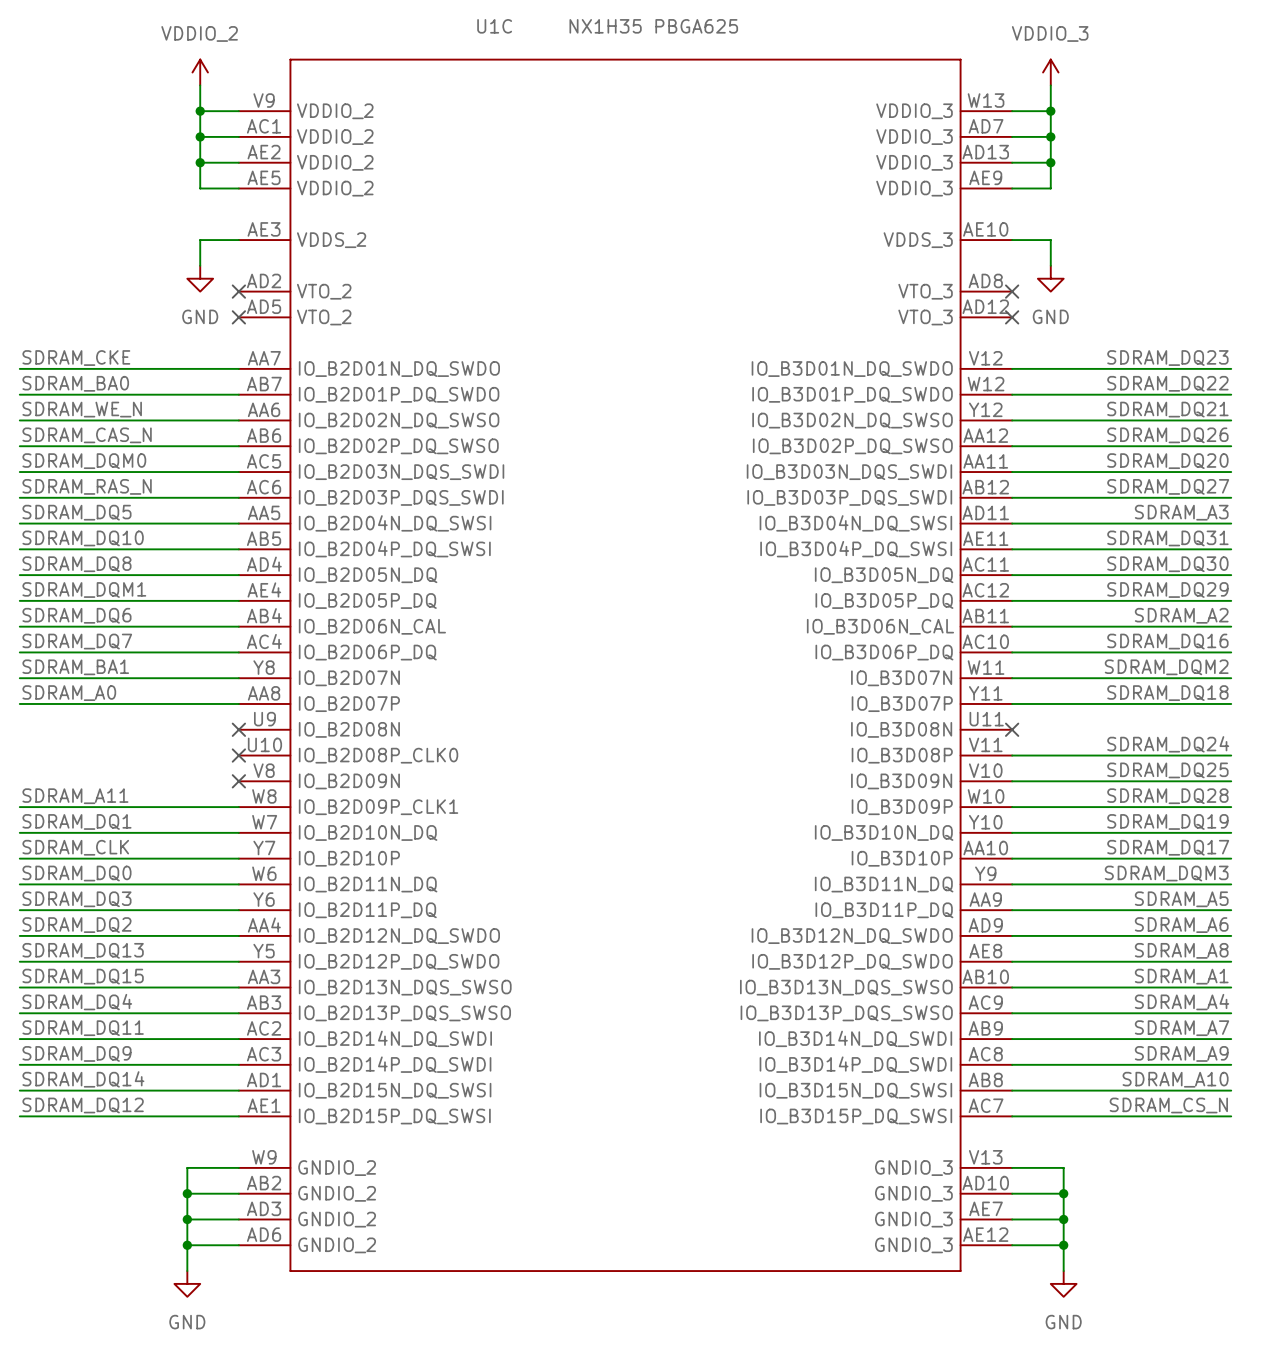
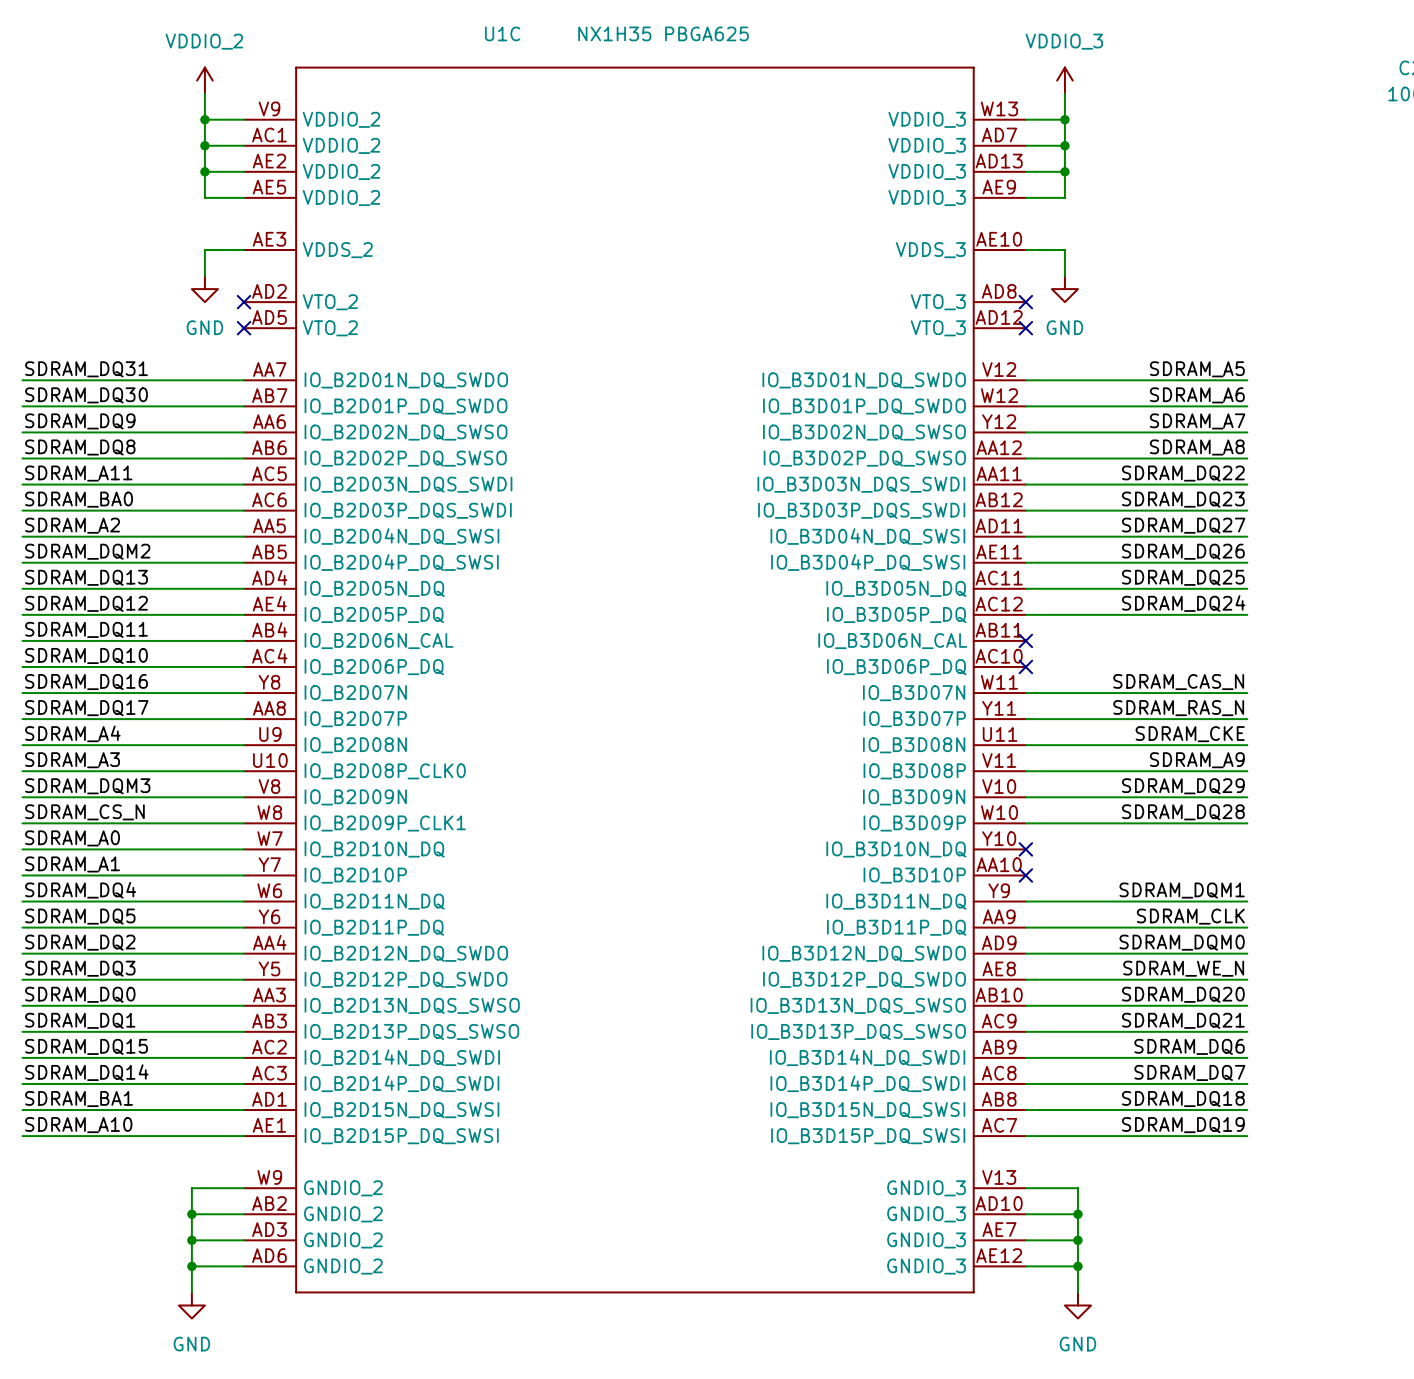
label: SDRAM_CKE (76, 358) -> SDRAM_DQ31 (86, 369)
label: SDRAM_DQ23 (1167, 358) -> SDRAM_A5 (1197, 369)
label: SDRAM_BA0 (75, 383) -> SDRAM_DQ30 (86, 395)
label: SDRAM_DQ22 (1167, 383) -> SDRAM_A6 (1197, 395)
label: SDRAM_WE_N (82, 409) -> SDRAM_DQ9 (80, 421)
label: SDRAM_DQ21 (1167, 409) -> SDRAM_A7 (1197, 421)
label: SDRAM_CAS_N (87, 435) -> SDRAM_DQ8 (80, 447)
label: SDRAM_DQ26 (1167, 435) -> SDRAM_A8 (1197, 447)
label: SDRAM_DQM0 (84, 461) -> SDRAM_A11 (78, 473)
label: SDRAM_DQ20 (1167, 461) -> SDRAM_DQ22 (1183, 473)
label: SDRAM_RAS_N (87, 486) -> SDRAM_BA0 (79, 499)
label: SDRAM_DQ27 (1168, 486) -> SDRAM_DQ23 (1183, 499)
label: SDRAM_DQ5 (76, 512) -> SDRAM_A2 (72, 525)
label: SDRAM_A3 (1181, 512) -> SDRAM_DQ27 (1183, 525)
label: SDRAM_DQ10 (83, 538) -> SDRAM_DQM2 (87, 551)
label: SDRAM_DQ31 (1167, 538) -> SDRAM_DQ26 (1183, 551)
label: SDRAM_DQ8 (76, 564) -> SDRAM_DQ13 (86, 577)
label: SDRAM_DQ30 (1167, 564) -> SDRAM_DQ25 (1183, 577)
label: SDRAM_DQM1 (84, 590) -> SDRAM_DQ12 (86, 603)
label: SDRAM_DQ29 (1167, 590) -> SDRAM_DQ24 (1183, 603)
label: SDRAM_DQ6 (76, 615) -> SDRAM_DQ11 (86, 629)
label: SDRAM_A2 (1181, 615) -> none
wire: (1012, 626) (1231, 626) -> none
no-connect mark: none -> (1025, 640)
label: SDRAM_DQ7 (77, 641) -> SDRAM_DQ10 (86, 655)
label: SDRAM_DQ16 (1167, 641) -> none
wire: (1012, 652) (1231, 652) -> (1025, 745) (1247, 745)
no-connect mark: none -> (1025, 666)
label: SDRAM_BA1 (75, 667) -> SDRAM_DQ16 (86, 682)
label: SDRAM_DQM2 (1166, 667) -> SDRAM_CAS_N (1178, 682)
label: SDRAM_A0 (69, 693) -> SDRAM_DQ17 (86, 708)
label: SDRAM_DQ18 (1167, 693) -> SDRAM_RAS_N (1178, 708)
label: none -> SDRAM_A4 (72, 733)
label: none -> SDRAM_CKE (1190, 734)
wire: none -> (22, 745) (244, 745)
no-connect mark: (238, 729) -> none
no-connect mark: (1012, 729) -> none
label: none -> SDRAM_A3 (72, 760)
label: SDRAM_DQ24 (1168, 744) -> SDRAM_A9 (1197, 760)
wire: none -> (22, 771) (244, 771)
no-connect mark: (238, 755) -> none
label: none -> SDRAM_DQM3 (87, 786)
label: SDRAM_DQ25 (1167, 770) -> SDRAM_DQ29 (1183, 786)
wire: none -> (22, 797) (244, 797)
no-connect mark: (238, 781) -> none
label: SDRAM_A11 (75, 796) -> SDRAM_CS_N (84, 812)
label: SDRAM_DQ1 (76, 821) -> SDRAM_A0 (72, 838)
label: SDRAM_DQ19 (1167, 821) -> none
wire: (1012, 832) (1231, 832) -> none
no-connect mark: none -> (1025, 849)
label: SDRAM_CLK (75, 847) -> SDRAM_A1 (72, 864)
label: SDRAM_DQ17 (1168, 847) -> none
wire: (1012, 858) (1231, 858) -> none
no-connect mark: none -> (1025, 875)
label: SDRAM_DQ0 (76, 873) -> SDRAM_DQ4 (80, 890)
label: SDRAM_DQM3 (1166, 873) -> SDRAM_DQM1 (1182, 890)
label: SDRAM_DQ3 (76, 899) -> SDRAM_DQ5 (80, 916)
label: SDRAM_A5 (1181, 899) -> SDRAM_CLK (1190, 916)
label: SDRAM_A6 (1181, 925) -> SDRAM_DQM0 (1182, 942)
label: SDRAM_DQ13 (83, 950) -> SDRAM_DQ3 (80, 968)
label: SDRAM_A8 (1181, 950) -> SDRAM_WE_N (1183, 968)
label: SDRAM_DQ15 (83, 976) -> SDRAM_DQ0 (80, 994)
label: SDRAM_A1 (1181, 976) -> SDRAM_DQ20 (1183, 994)
label: SDRAM_DQ4 (77, 1002) -> SDRAM_DQ1 (80, 1020)
label: SDRAM_A4 (1182, 1002) -> SDRAM_DQ21 (1183, 1020)
label: SDRAM_DQ11 (83, 1028) -> SDRAM_DQ15 (86, 1046)
label: SDRAM_A7 (1182, 1028) -> SDRAM_DQ6 (1189, 1046)
label: SDRAM_DQ9 (76, 1053) -> SDRAM_DQ14 (86, 1072)
label: SDRAM_A9 (1181, 1053) -> SDRAM_DQ7 (1189, 1072)
label: SDRAM_DQ14 (83, 1079) -> SDRAM_BA1 (79, 1099)
label: SDRAM_A10 (1175, 1079) -> SDRAM_DQ18 (1183, 1099)
label: SDRAM_DQ12 (83, 1105) -> SDRAM_A10 (78, 1125)
label: SDRAM_CS_N (1168, 1105) -> SDRAM_DQ19 (1183, 1125)

